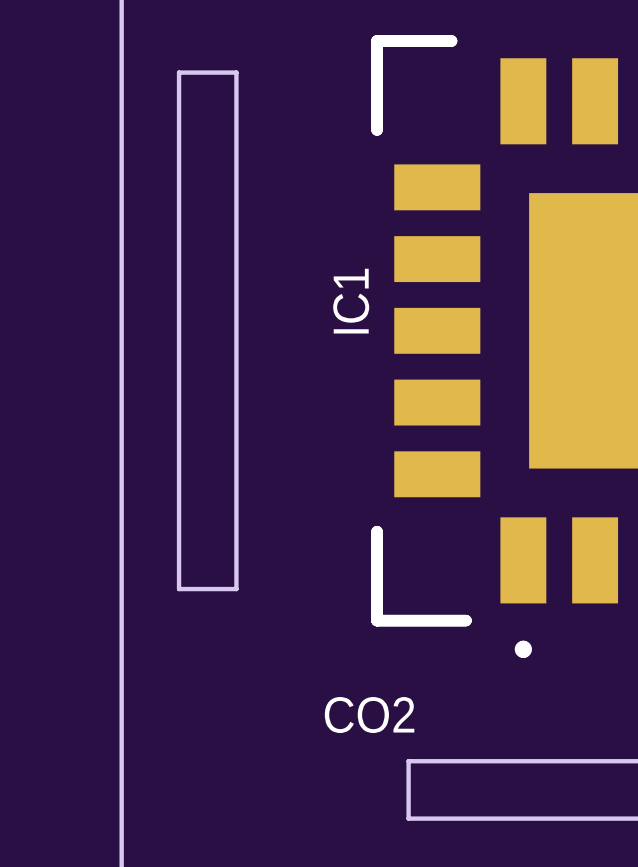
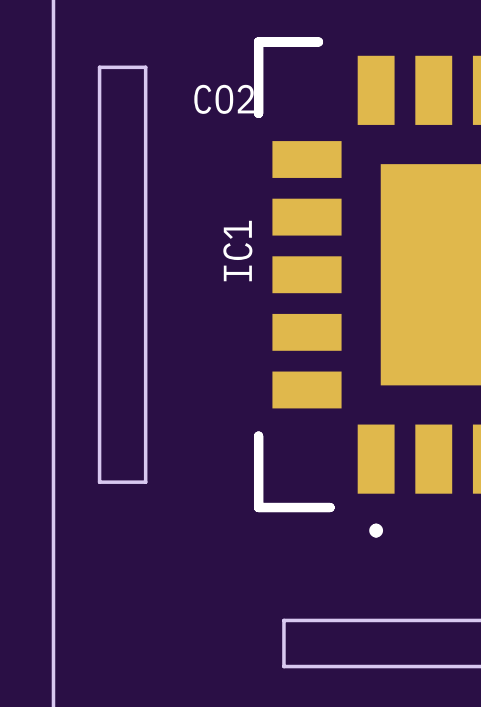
text position: CO2 (369, 715) -> CO2 (224, 99)

